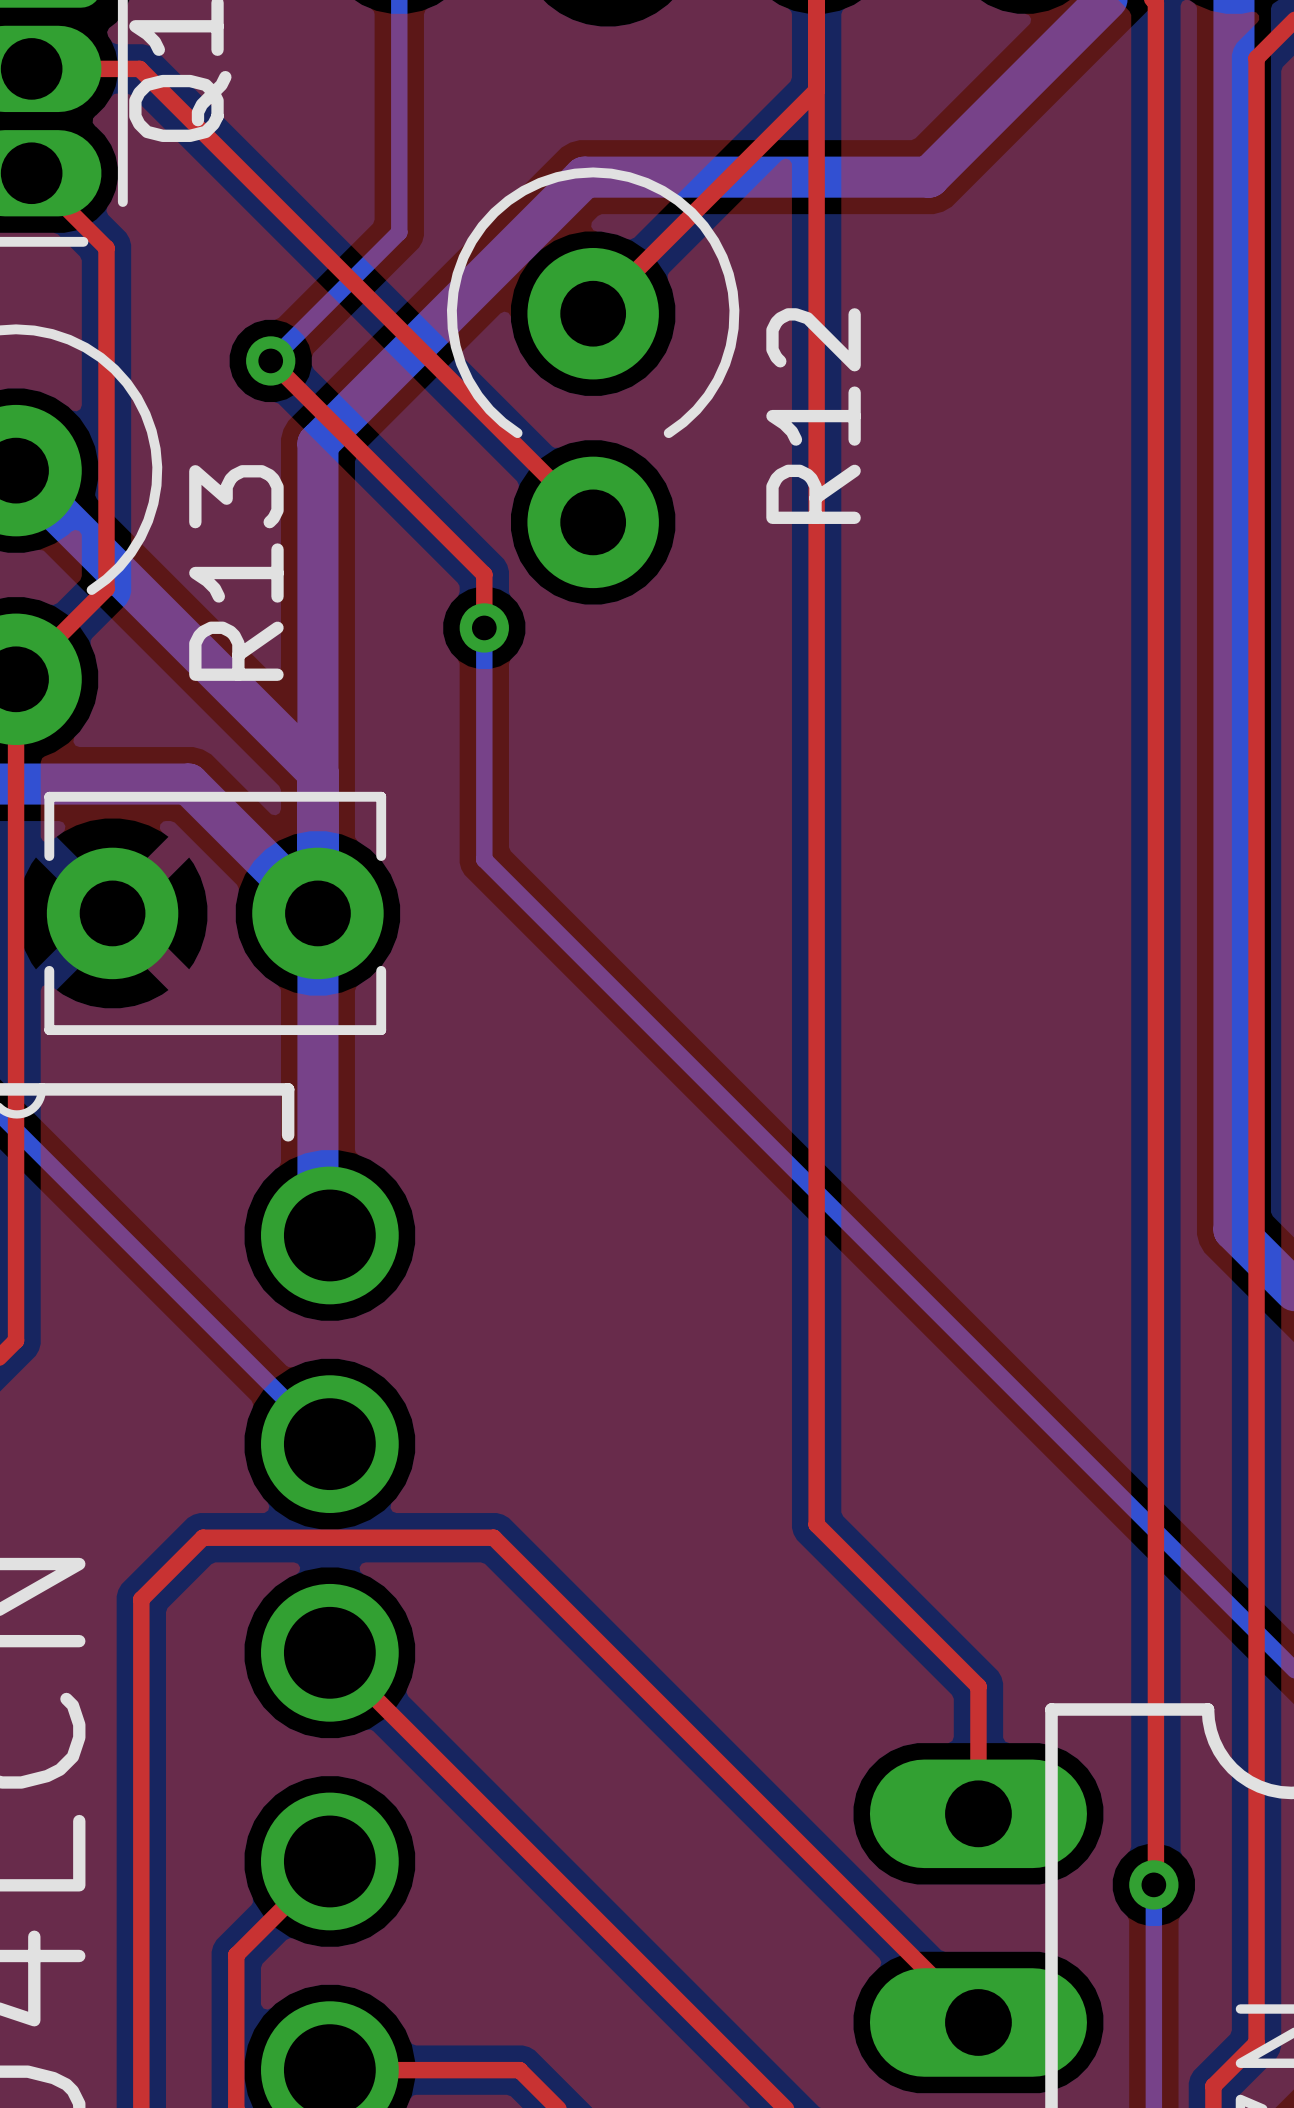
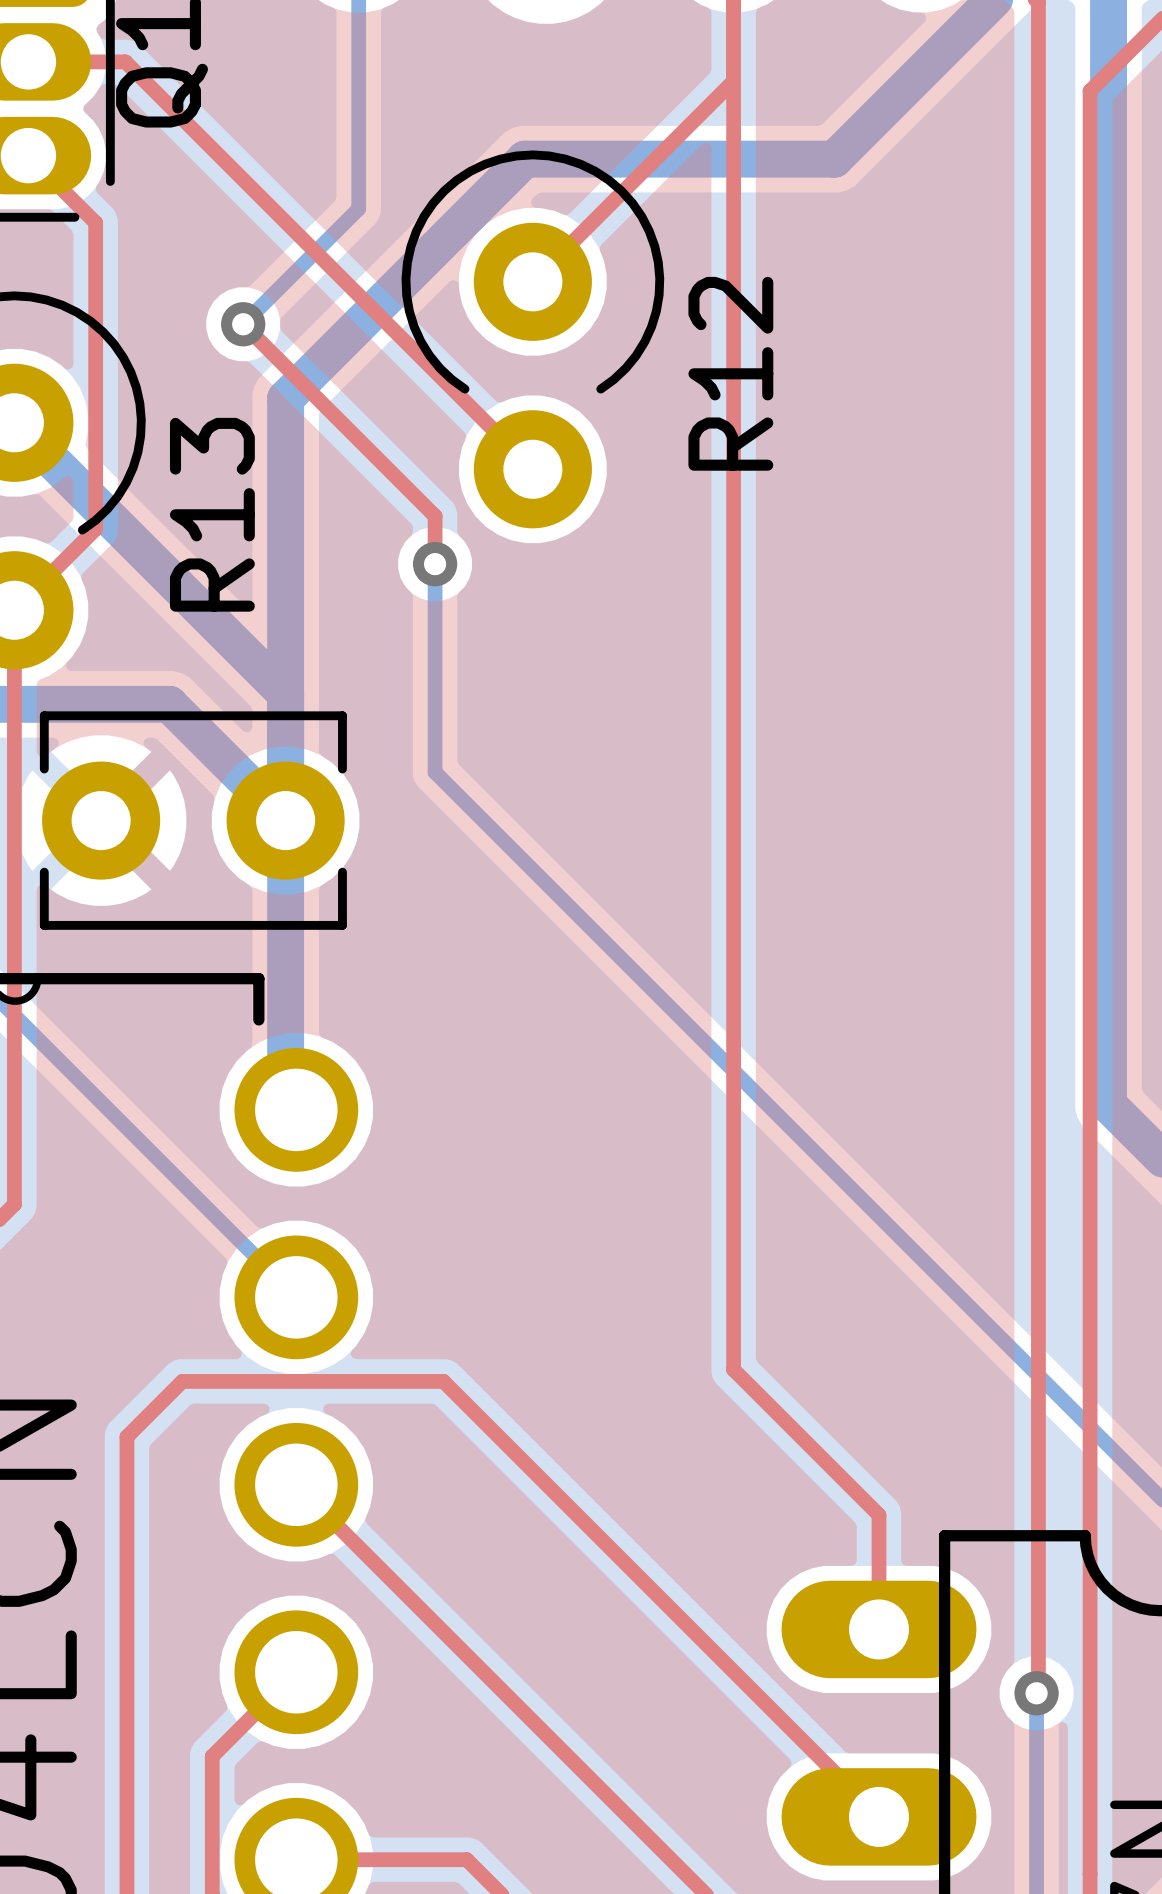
top track: (1256, 58) (1256, 2043) (1213, 2086) -> (1128, 52) (1090, 91) (1090, 1874)

